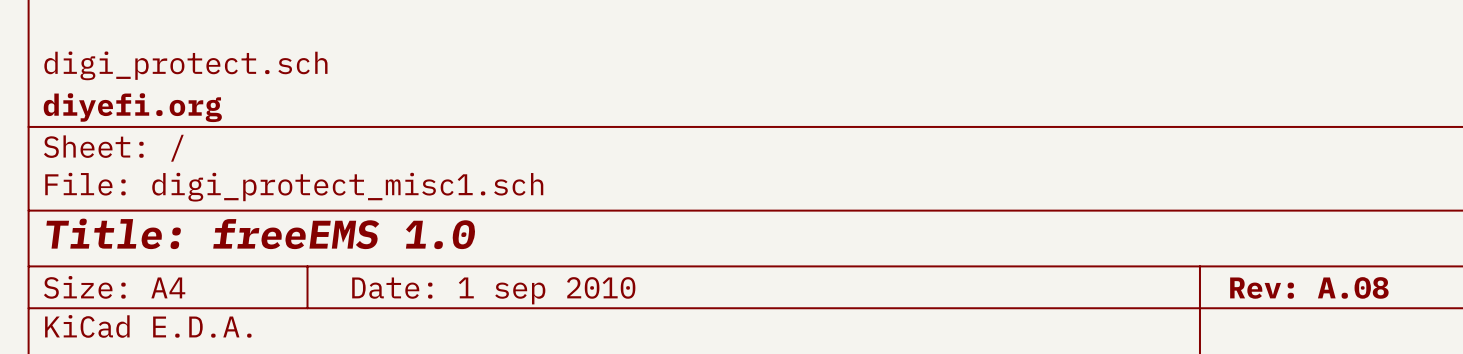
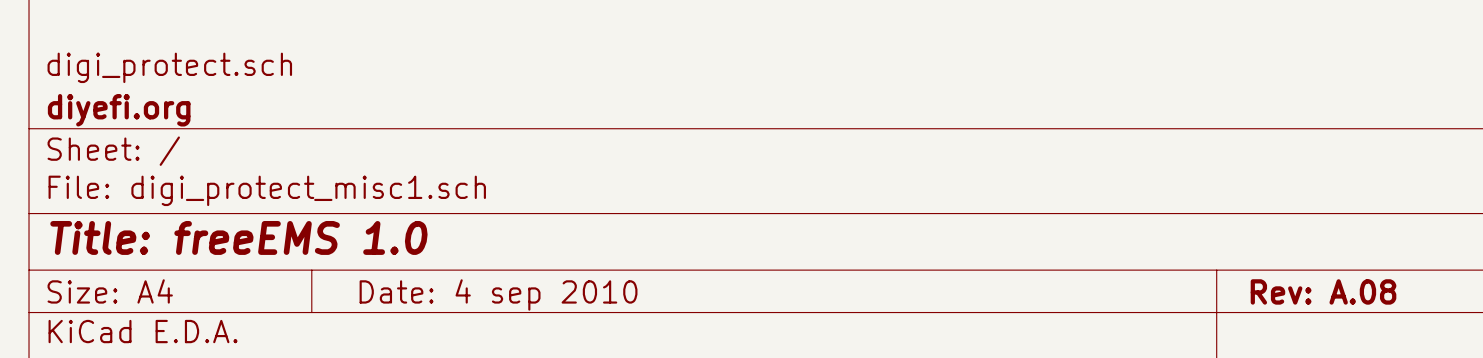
title block: Date: 1 sep 2010 (493, 290) -> Date: 4 sep 2010 (498, 294)

